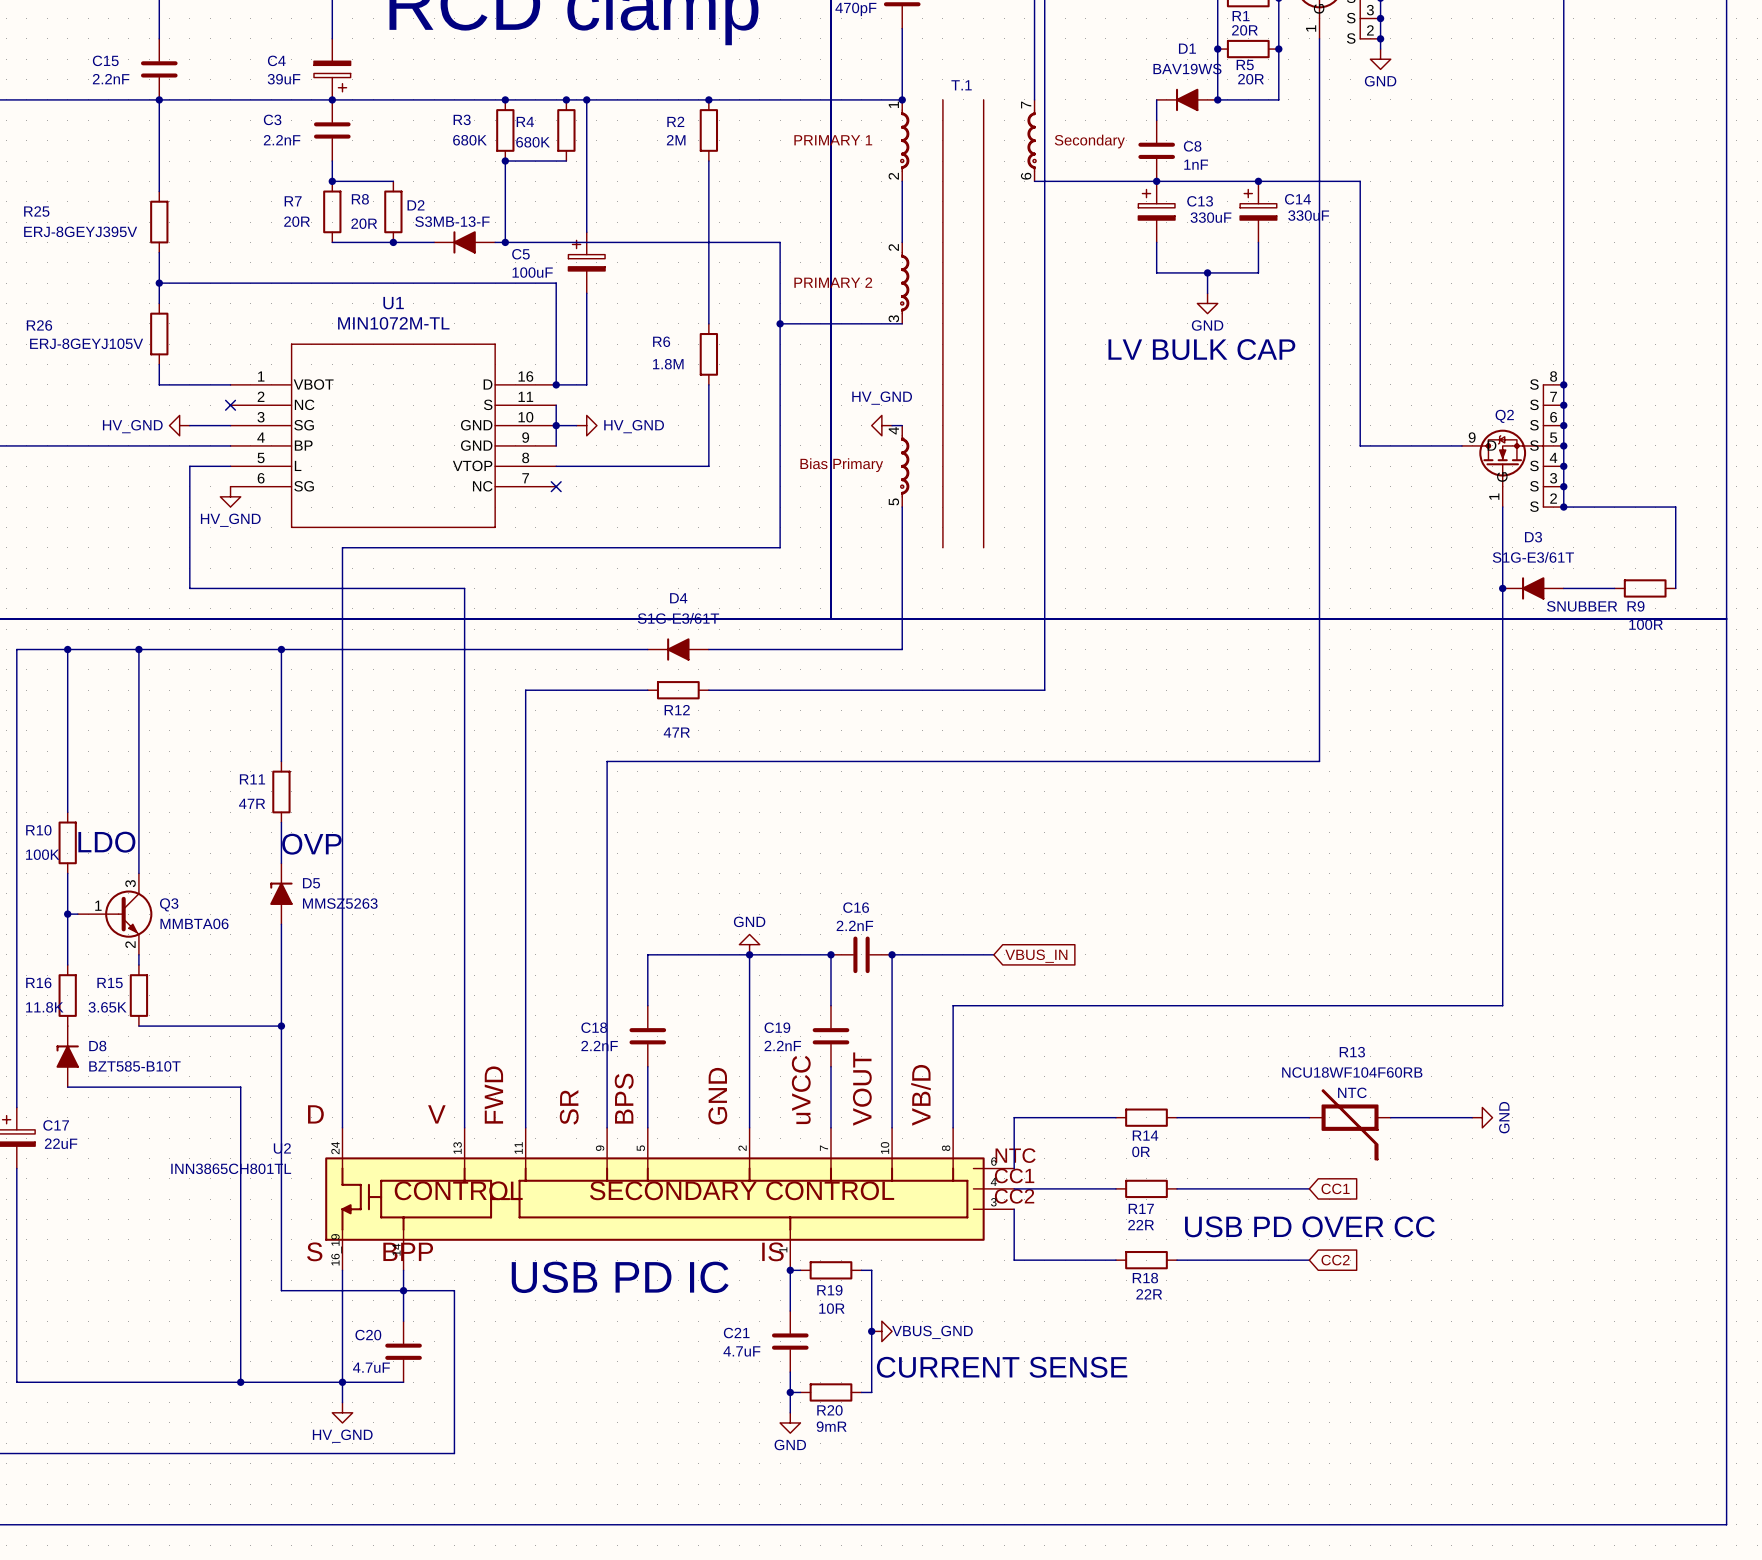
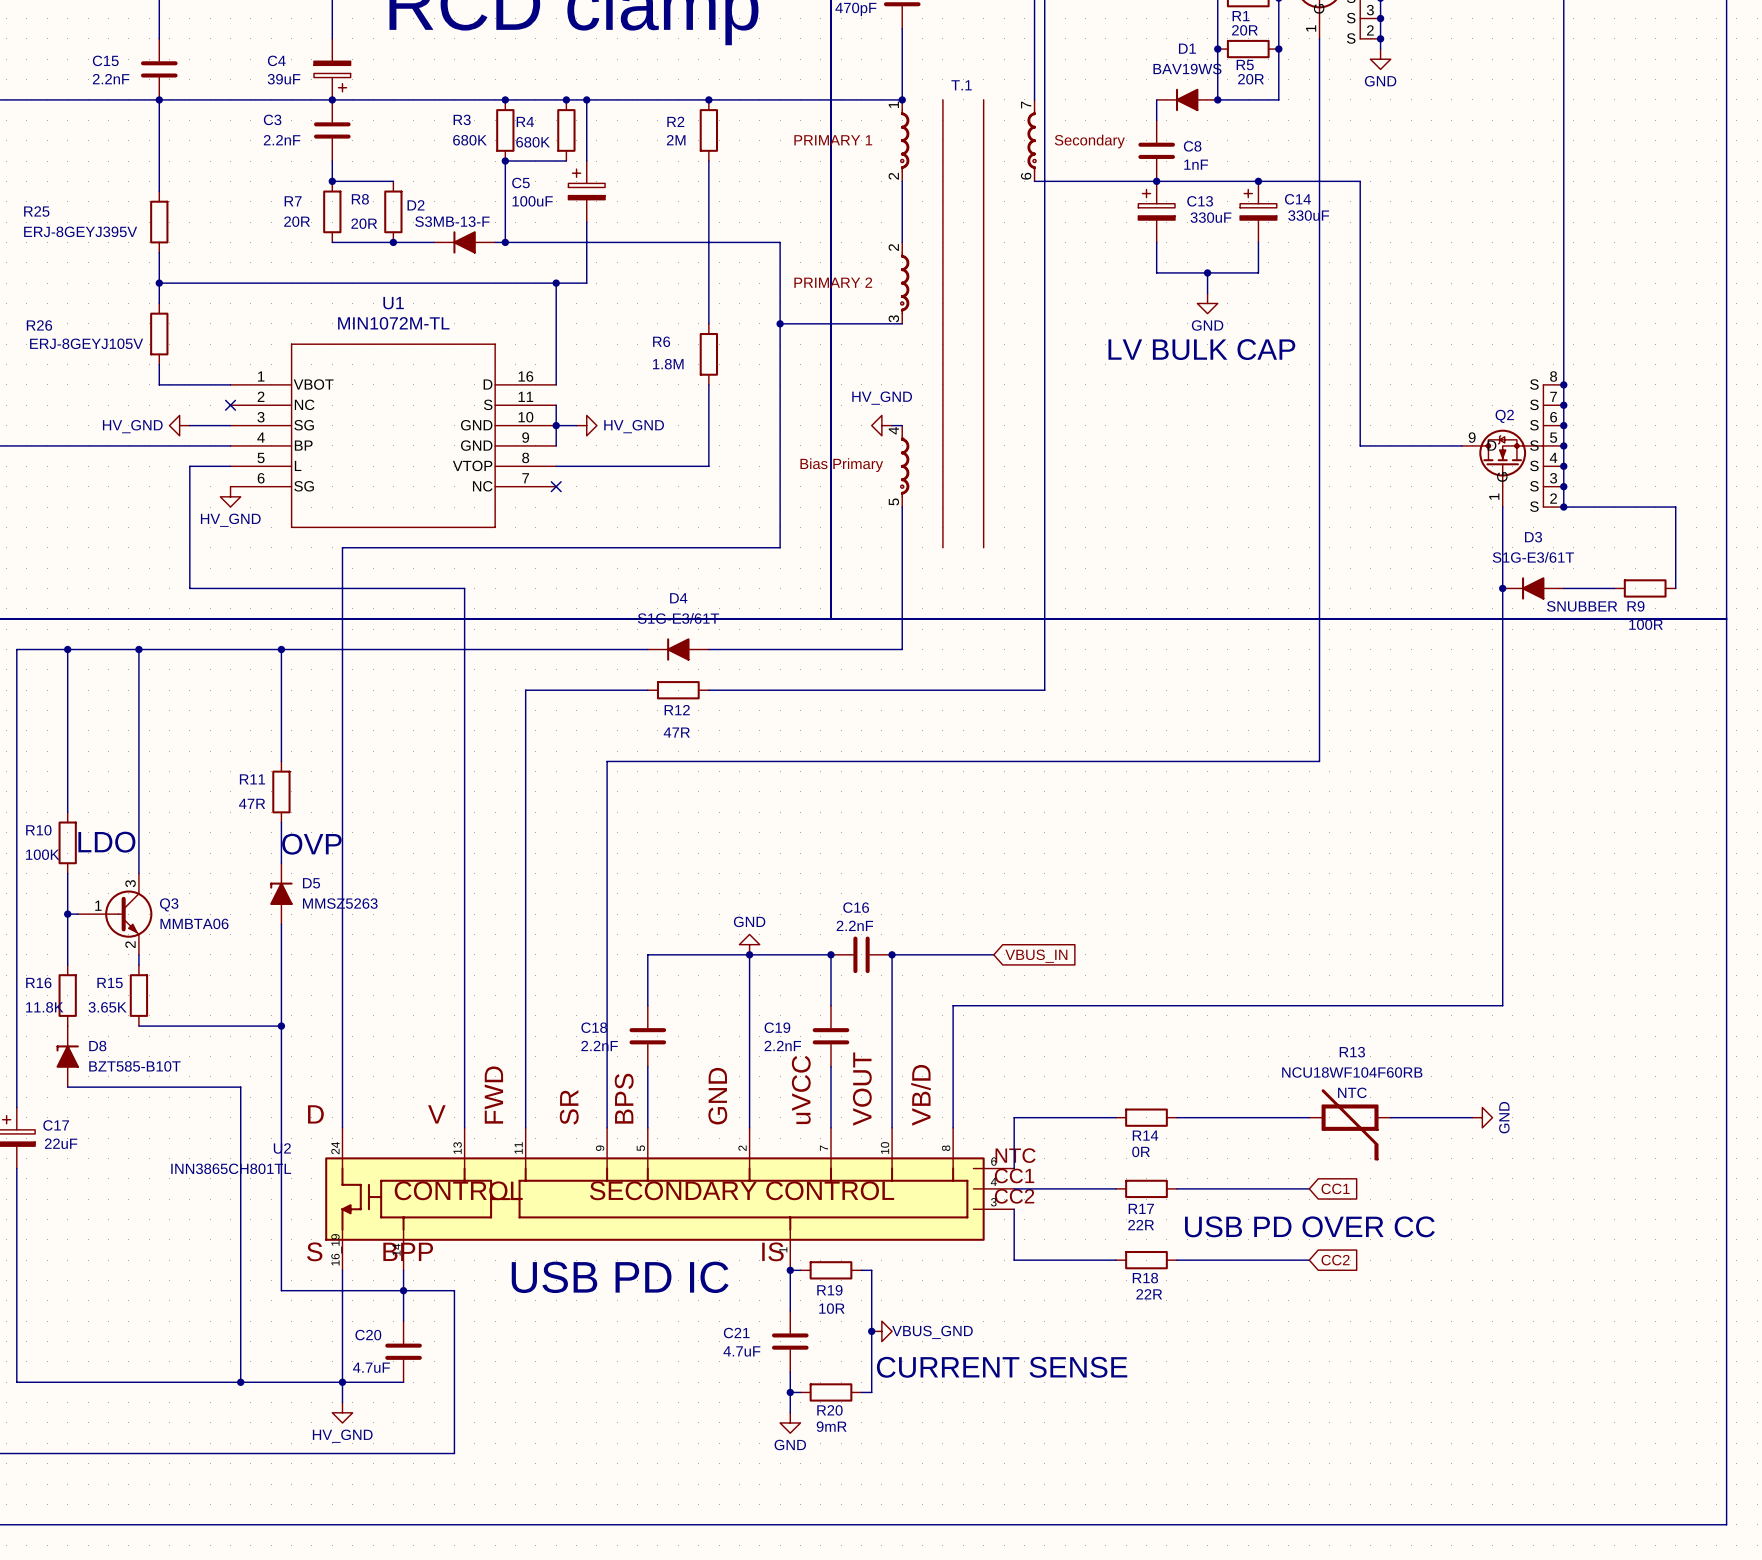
wire: none -> (586, 232) (586, 283) (556, 283)
C5 position: (586, 262) -> (586, 191)
junction: none -> (556, 283)
wire: (586, 293) (586, 384) (556, 384) -> none
junction: (556, 384) -> none

